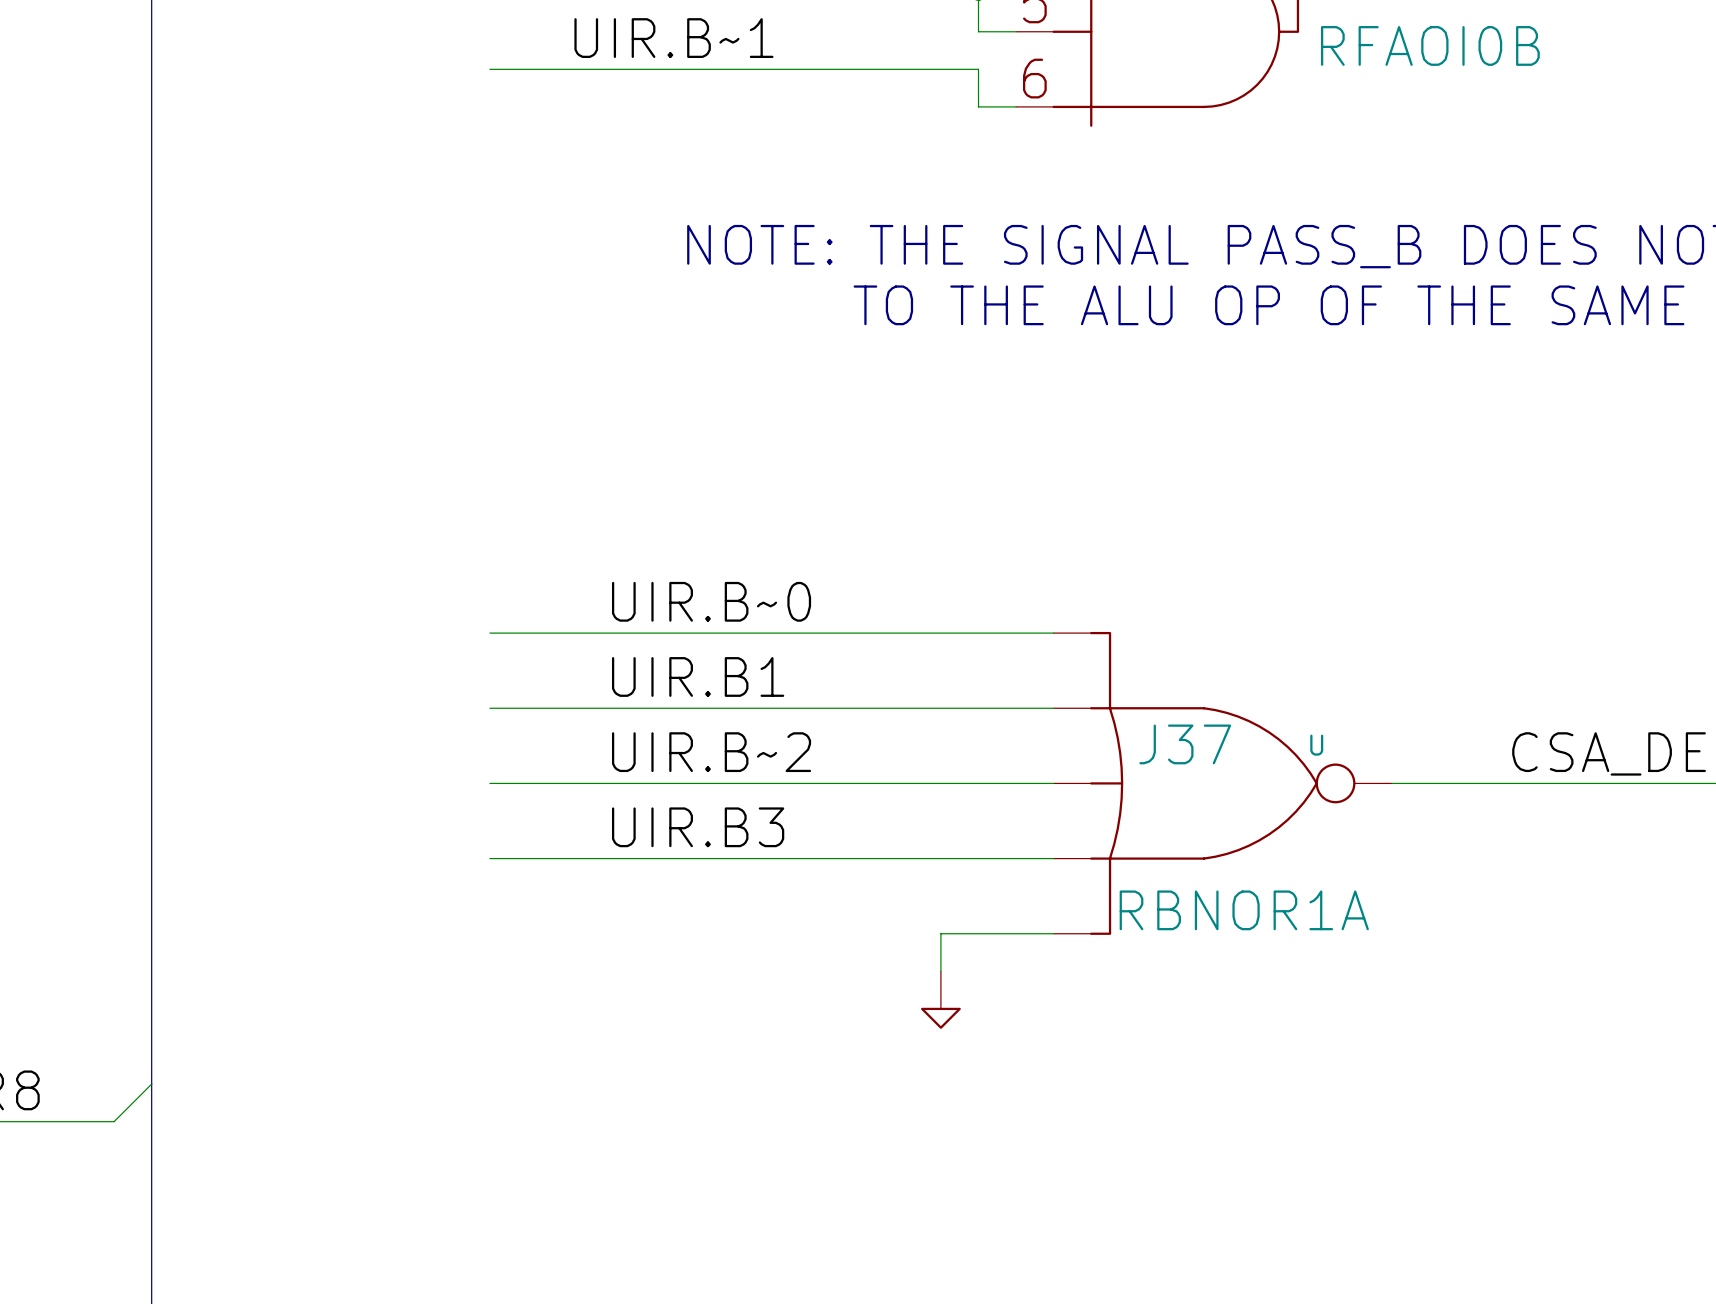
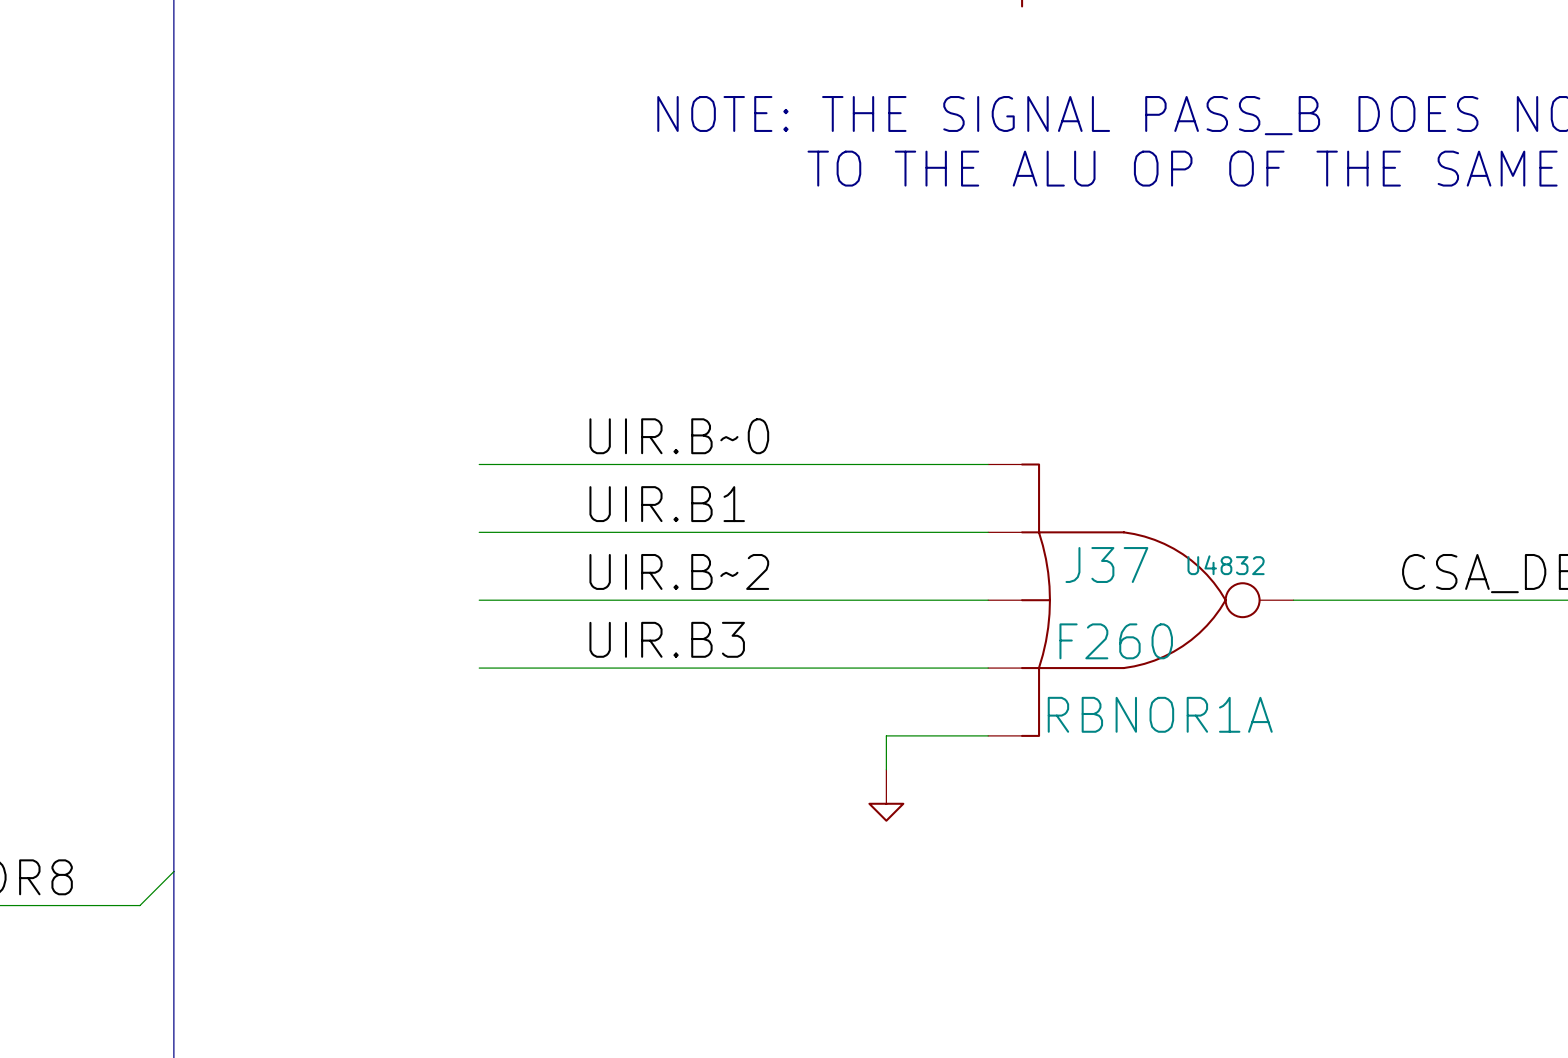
U name: U (1316, 745) -> U4832 (1226, 565)
U value: none -> F260 (1116, 641)

